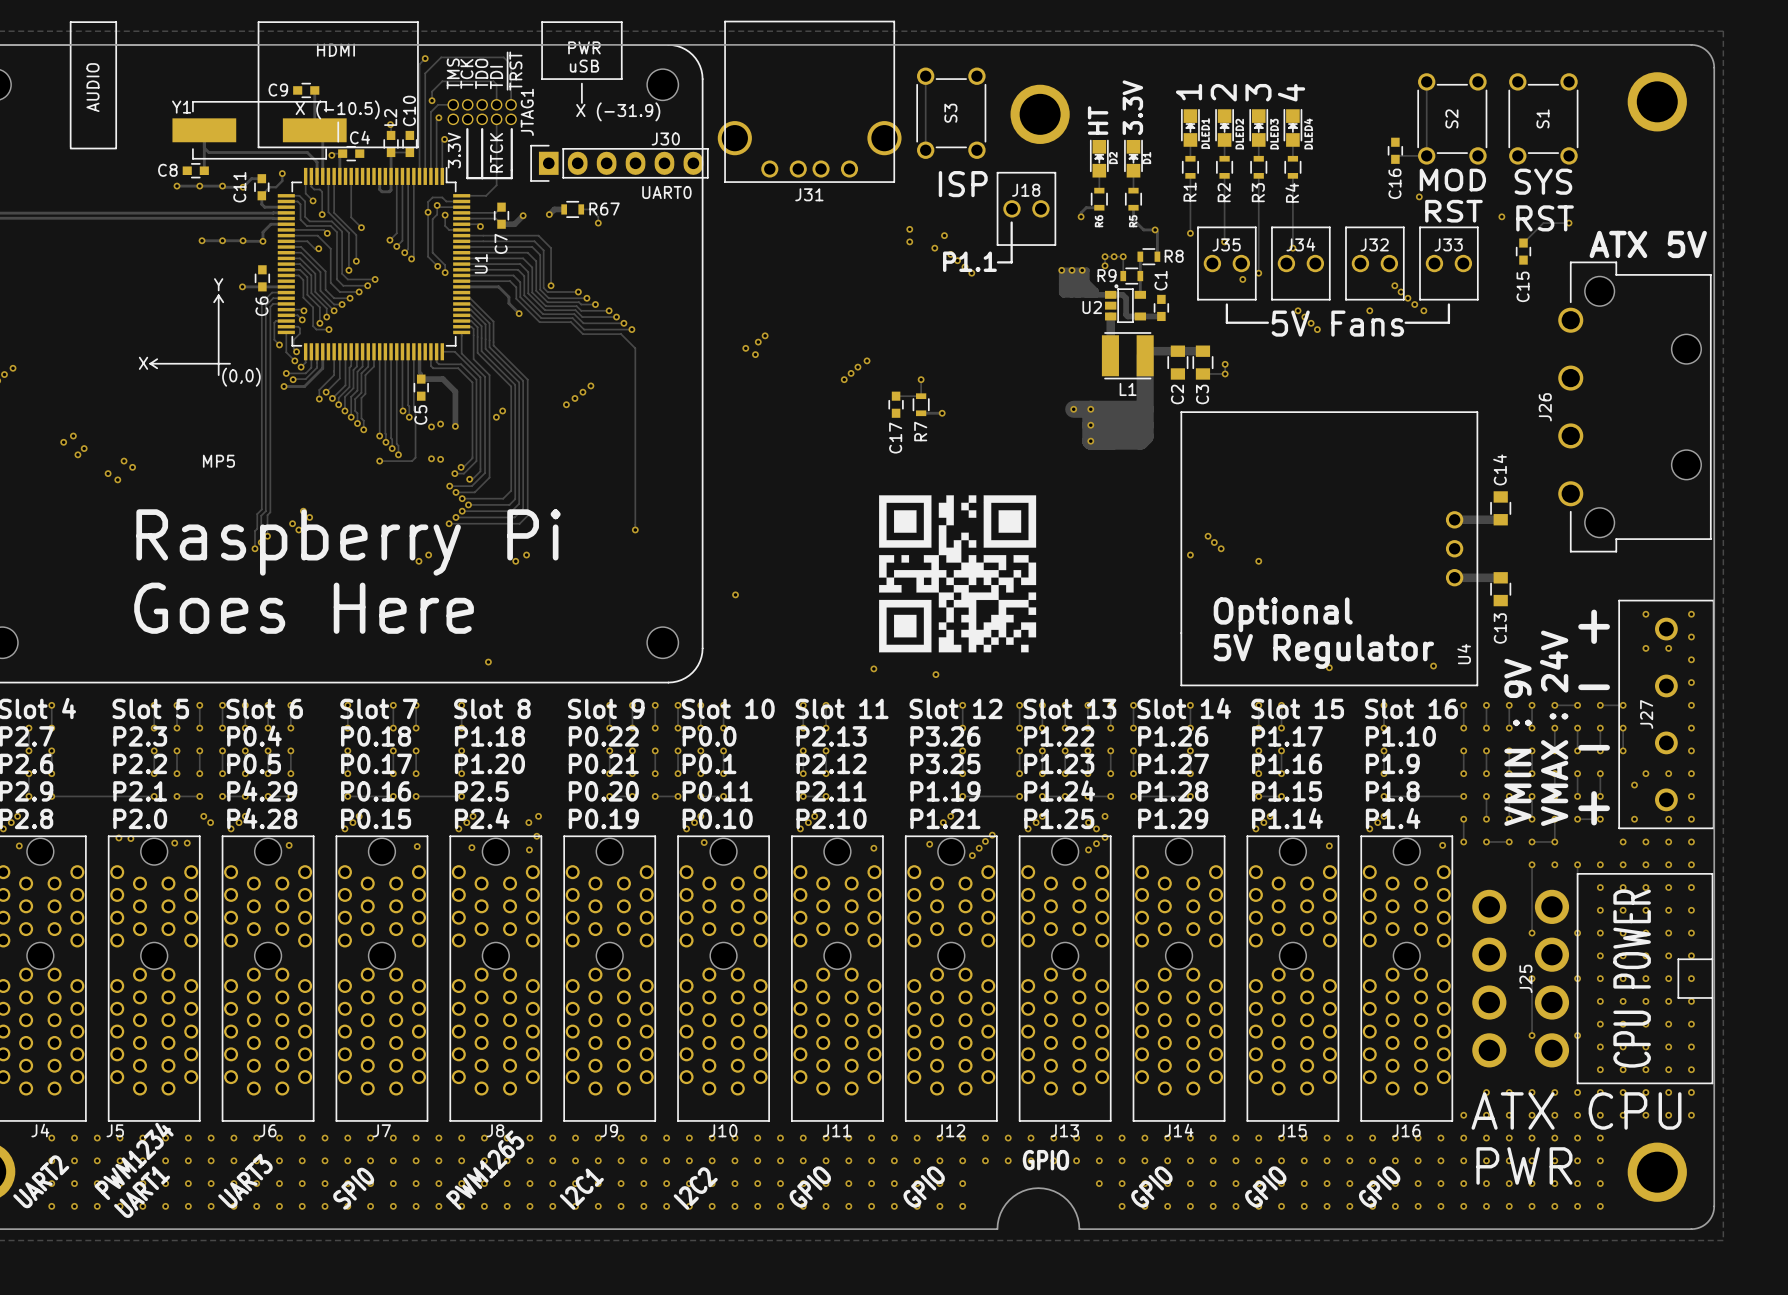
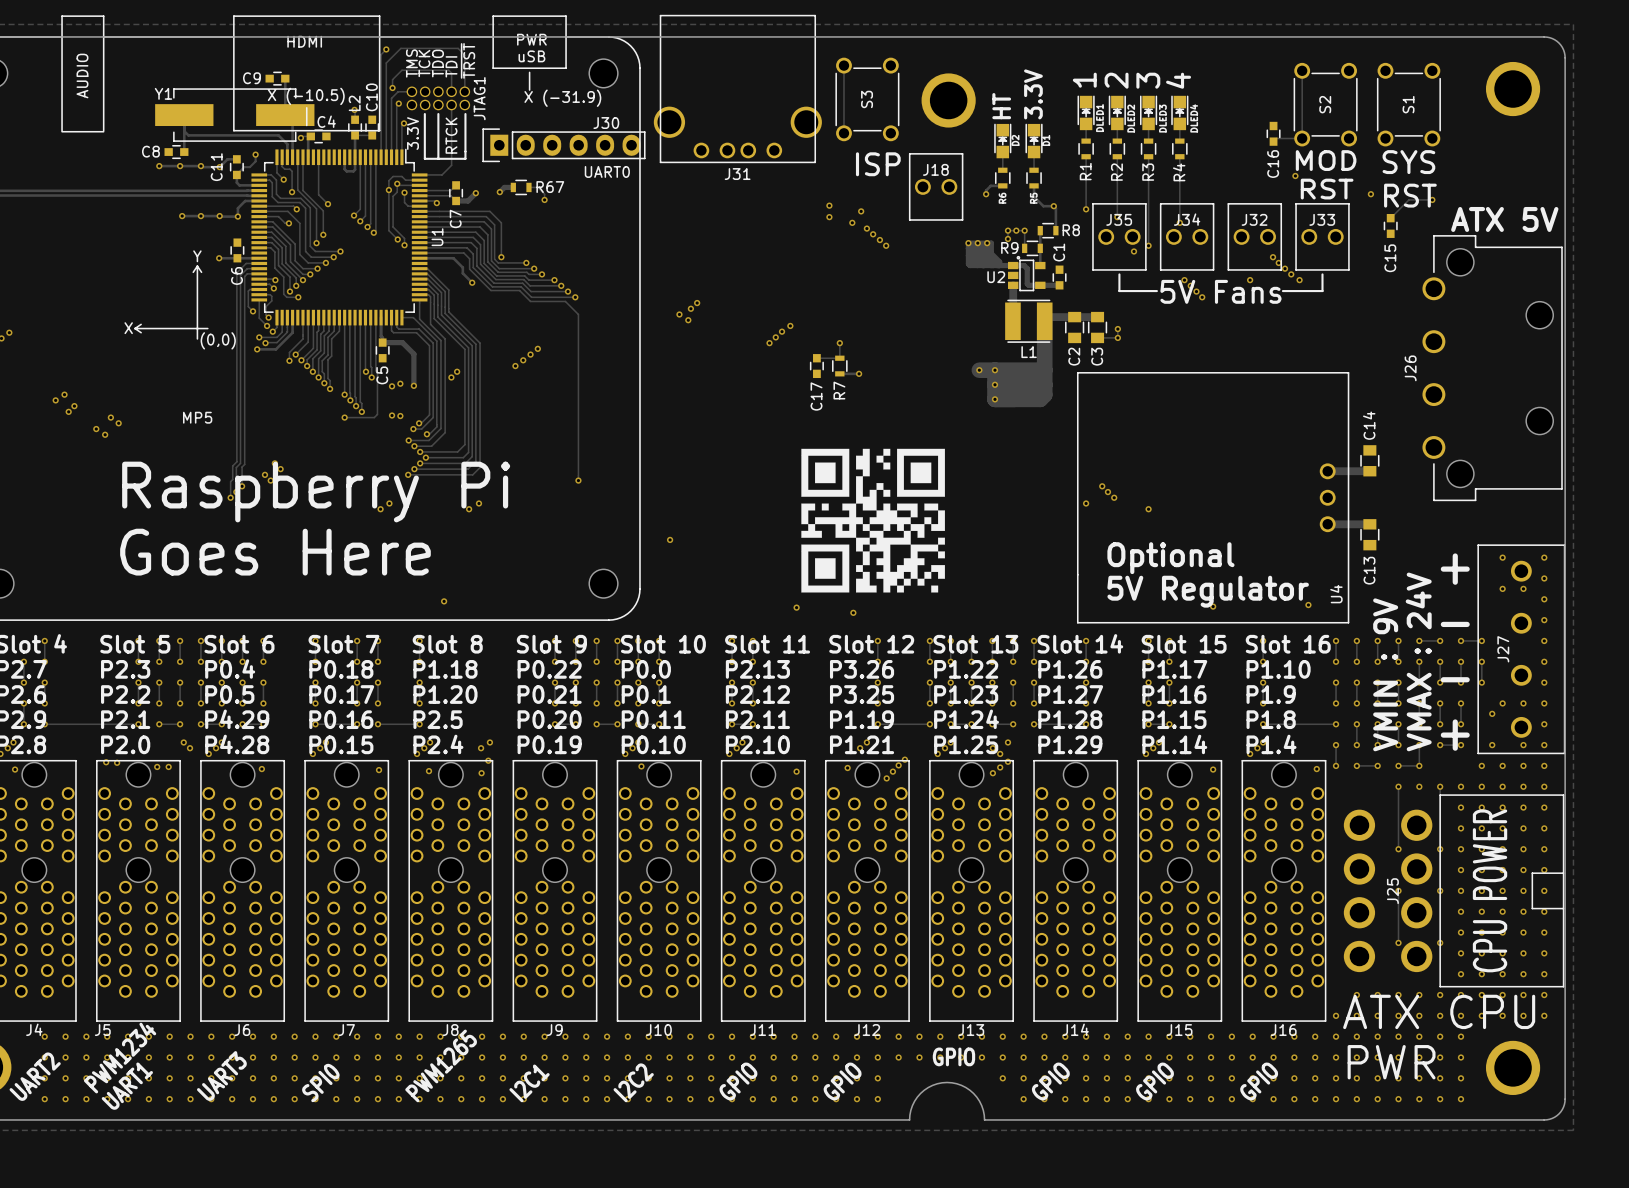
line: (1011, 222) (1011, 262) (997, 262) -> none
text: P1.1 (969, 261) -> none

